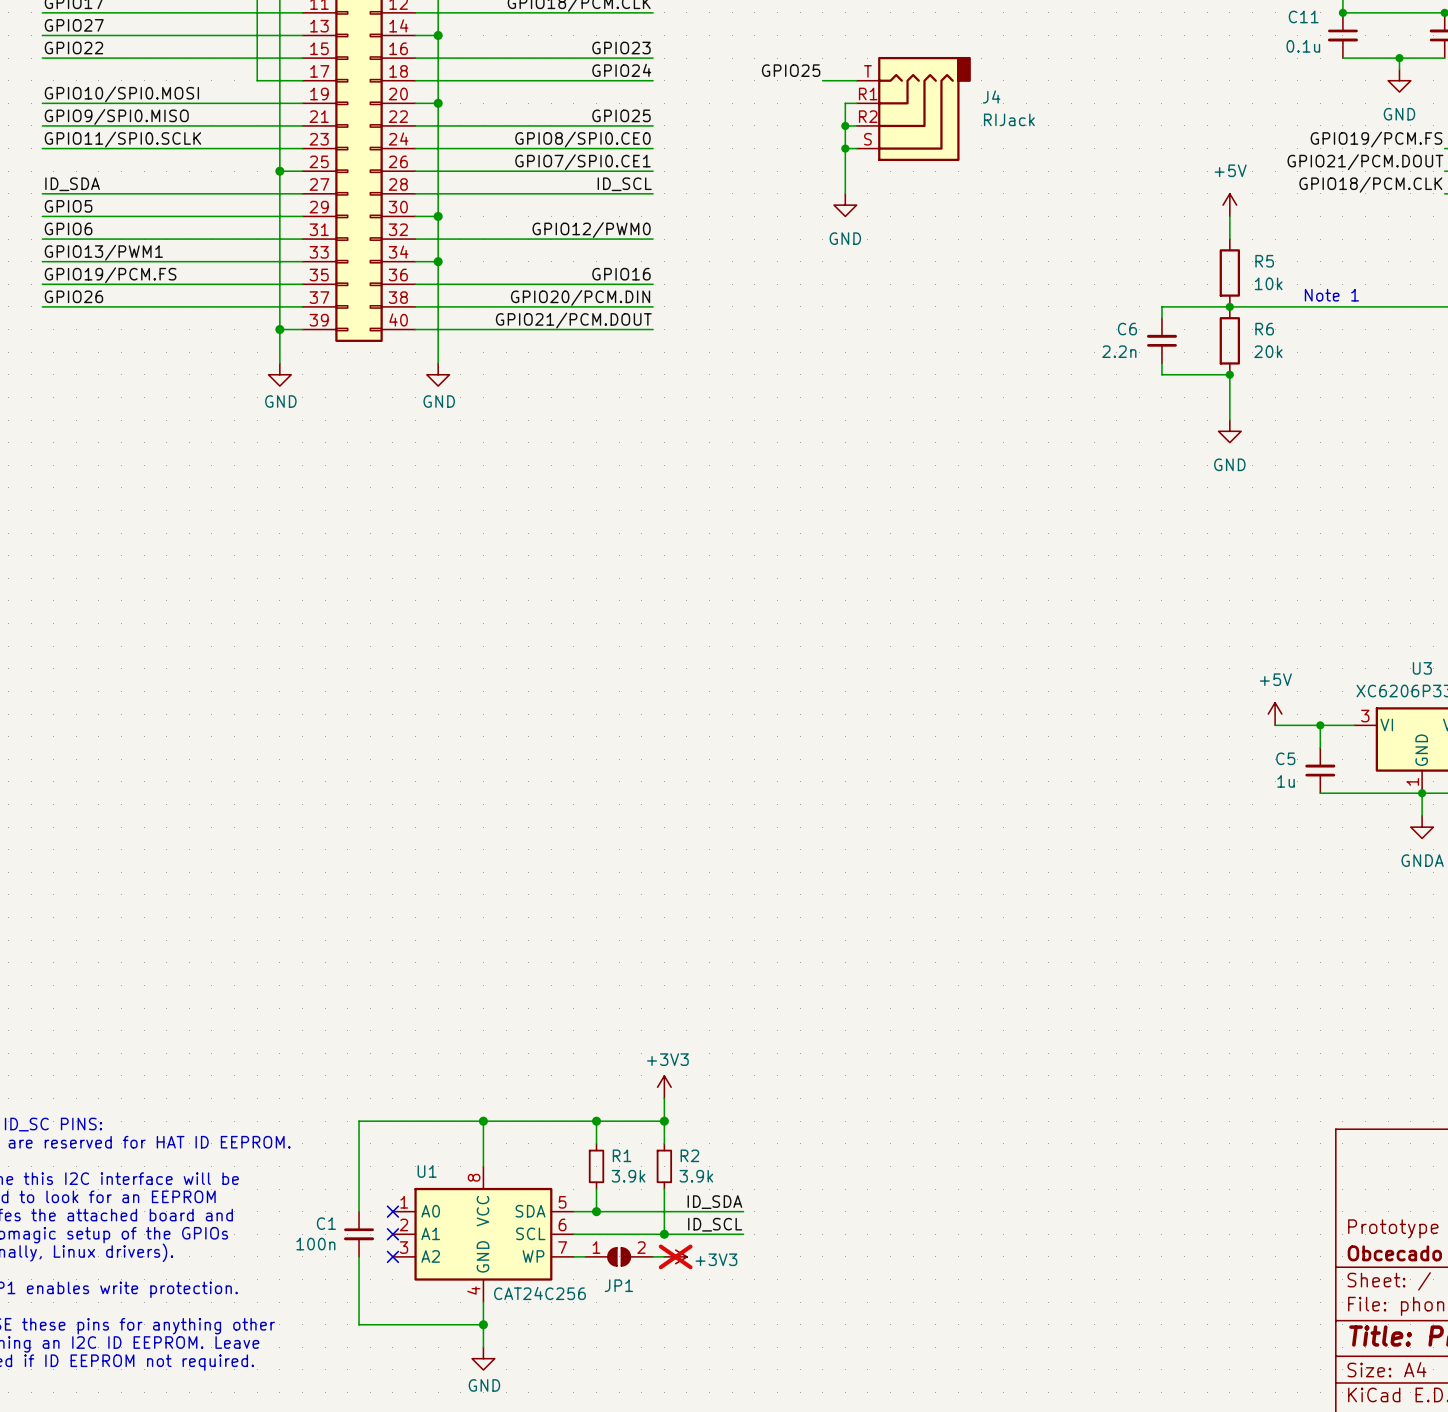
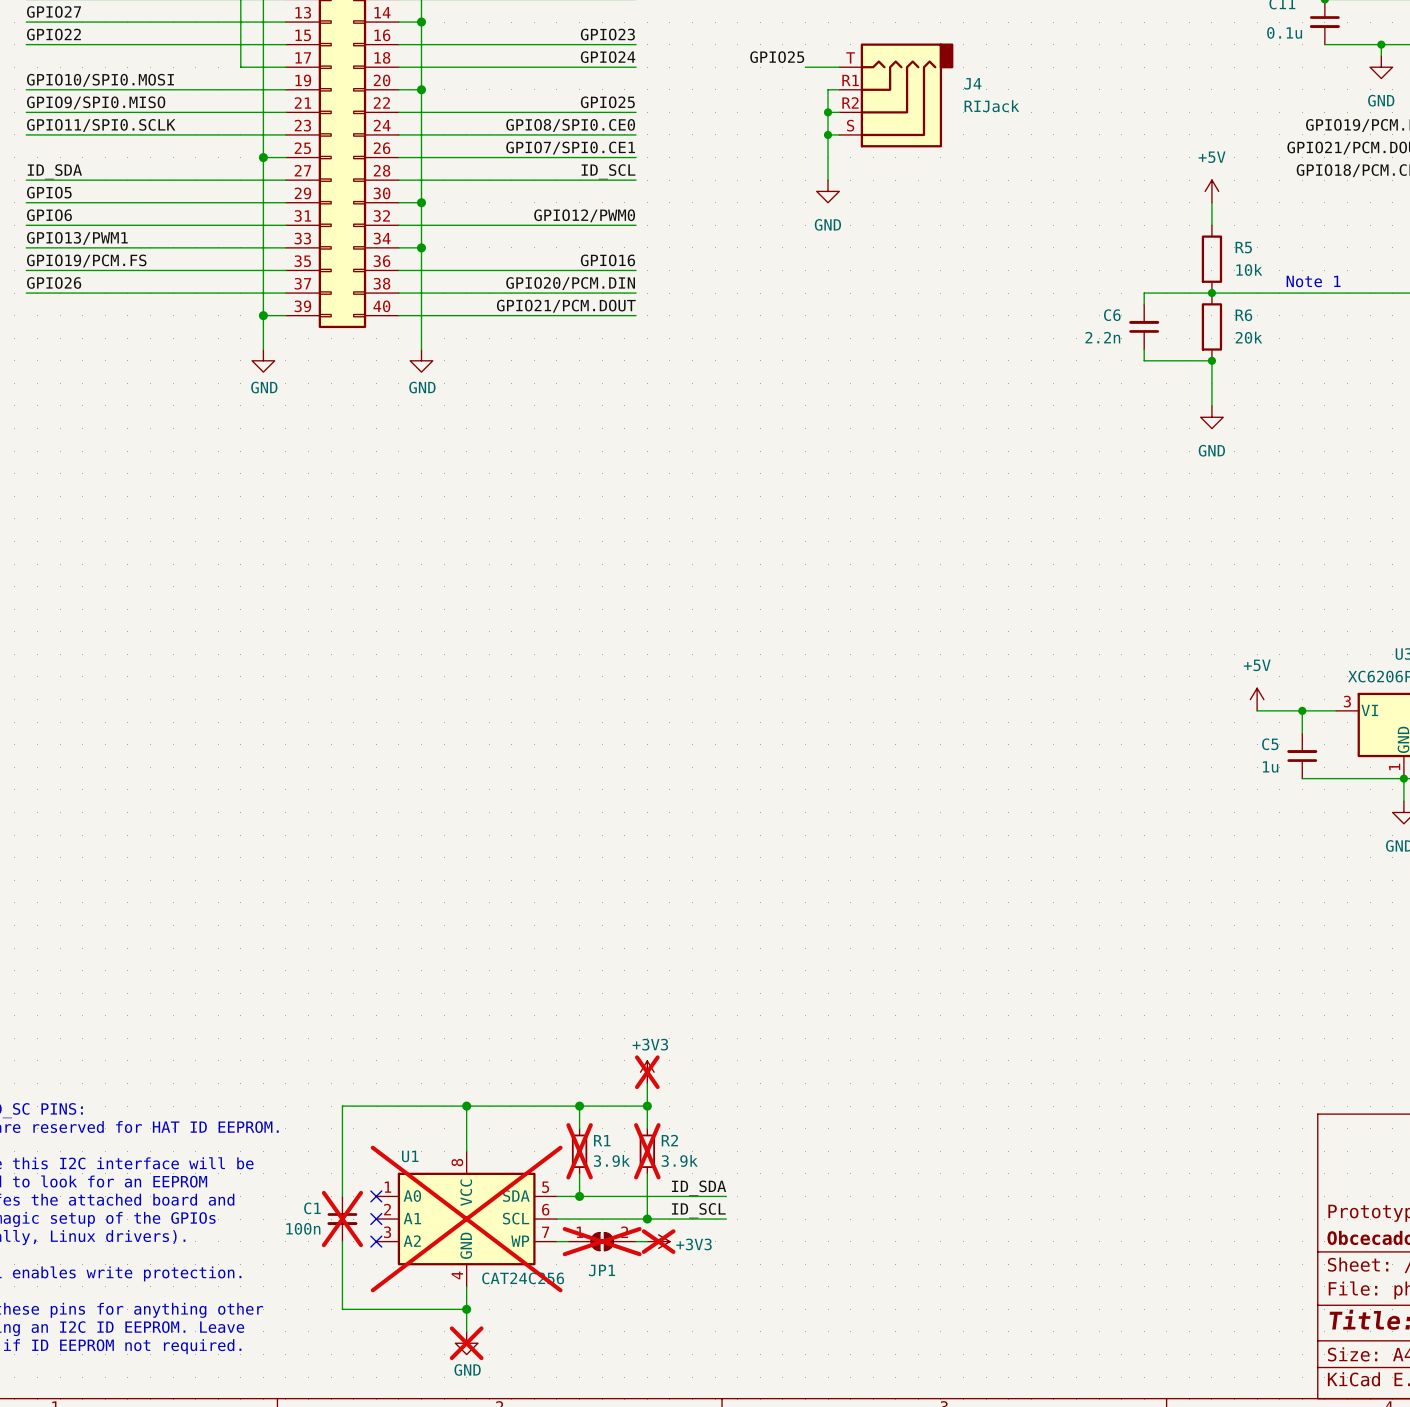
power symbol do-not-place cross: none -> (647, 1072)
R1 do-not-place cross: none -> (579, 1151)
R2 do-not-place cross: none -> (647, 1151)
C1 do-not-place cross: none -> (342, 1219)
U1 do-not-place cross: none -> (466, 1219)
JP1 do-not-place cross: none -> (602, 1241)
power symbol do-not-place cross: none -> (466, 1343)

